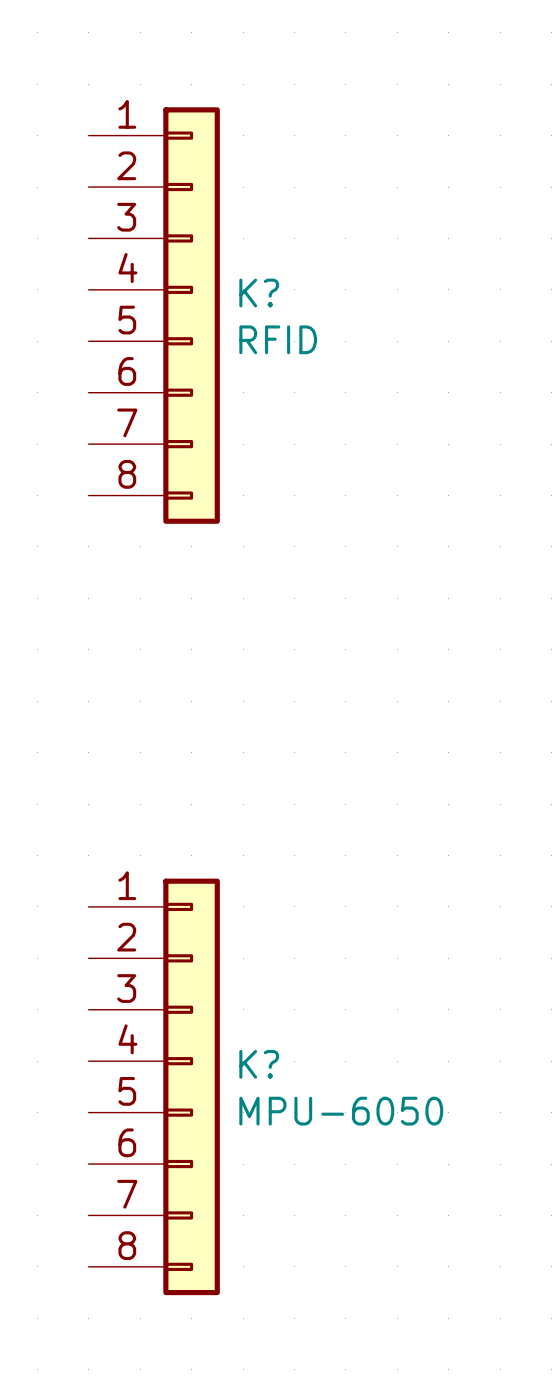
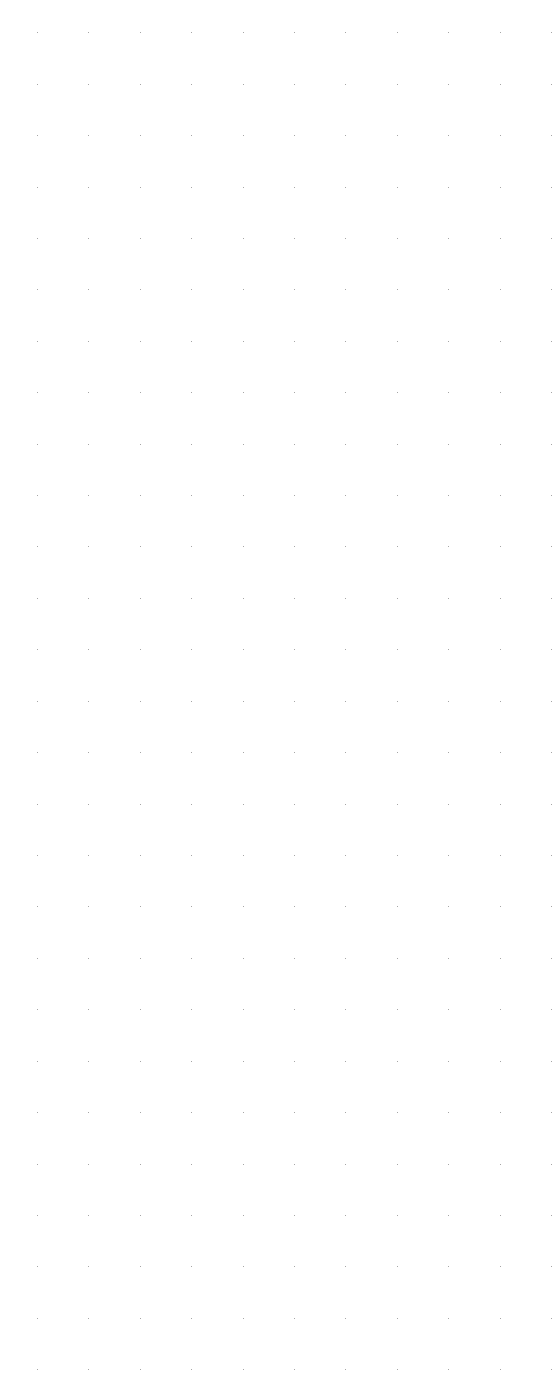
K?: RFID (154, 315) -> none
K?: MPU-6050 (154, 1086) -> none

